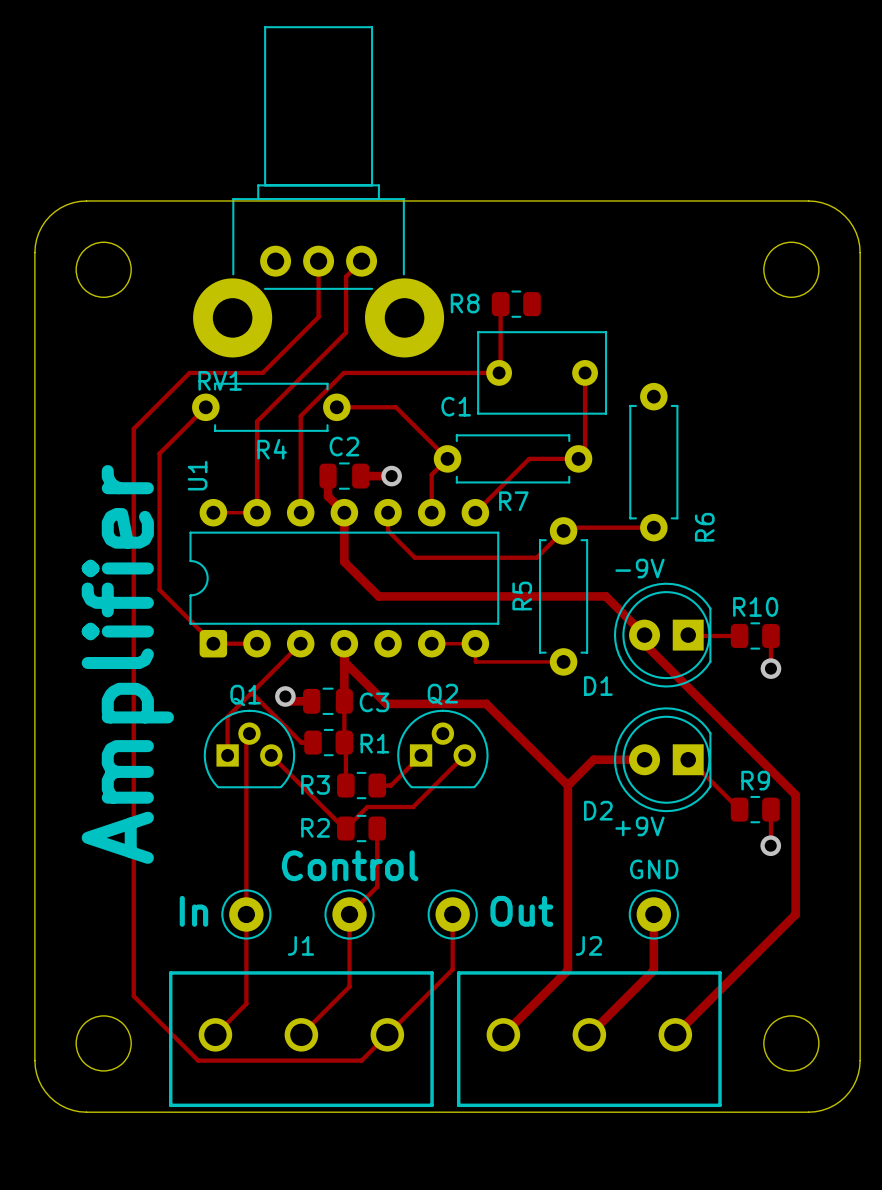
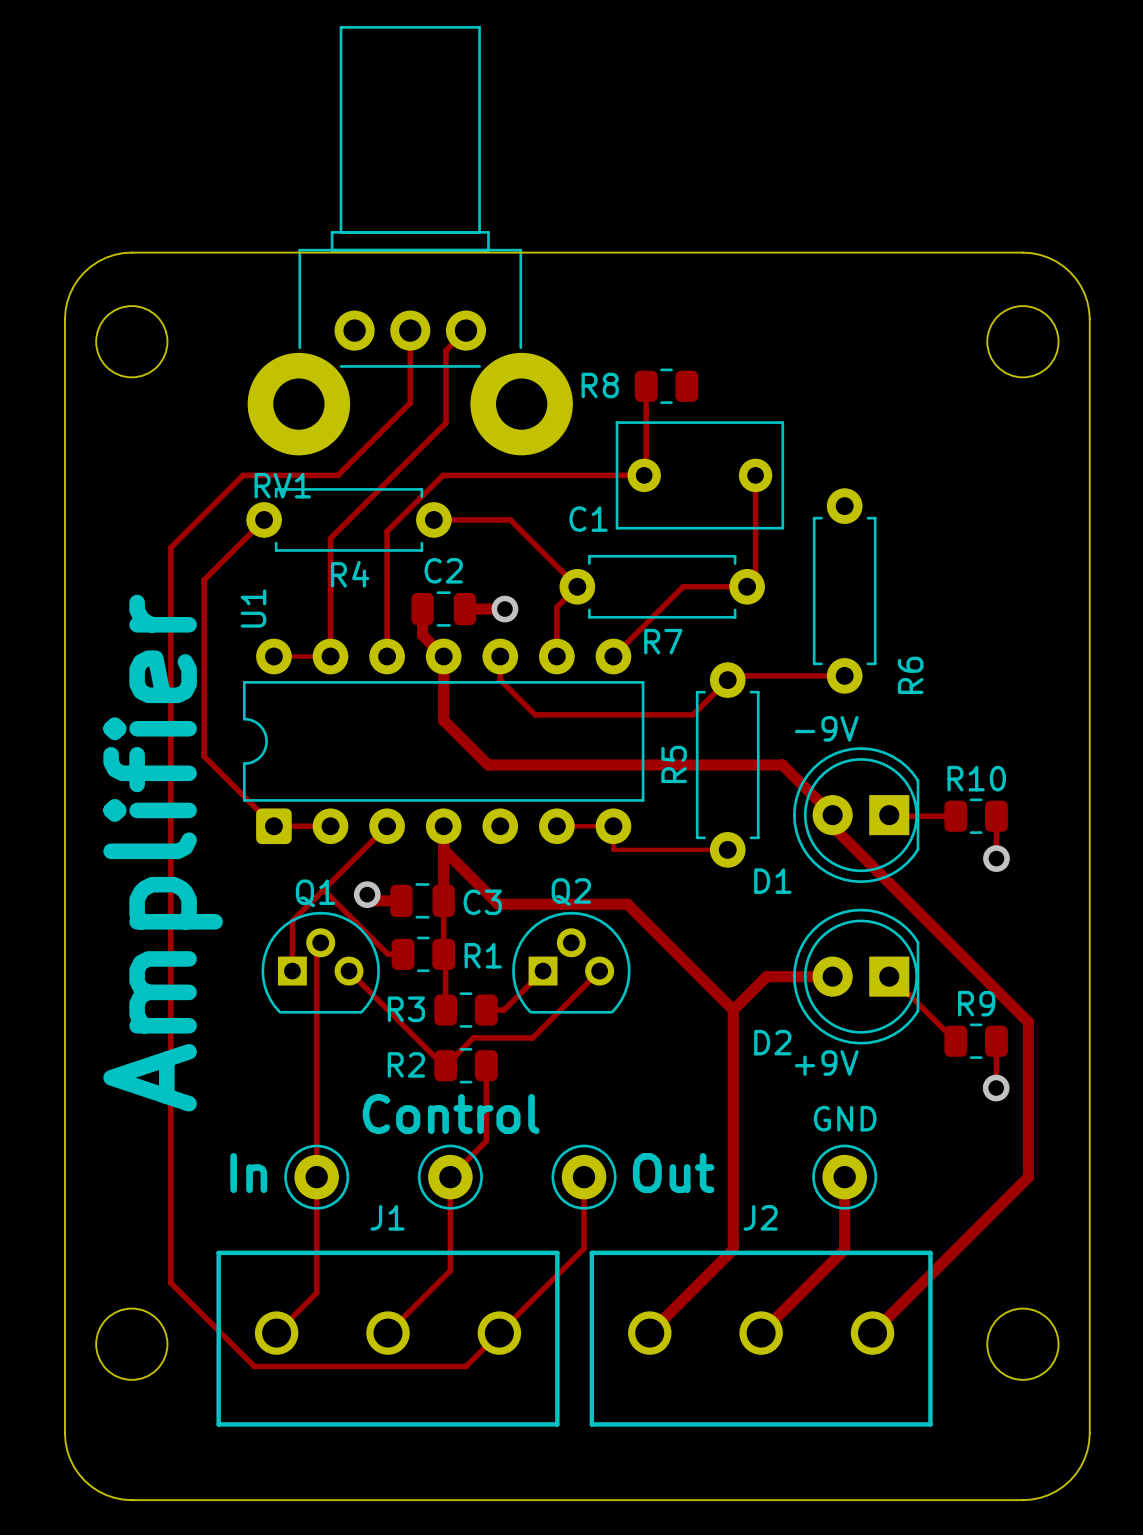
board edge: (103, 201) (73, 202) (55, 211) (45, 221) (38, 232) (34, 252) (34, 1060) (38, 1080) (50, 1097) (66, 1108) (86, 1112) (808, 1112) (821, 1110) (834, 1105) (849, 1092) (858, 1073) (860, 1060) (860, 252) (858, 239) (853, 226) (839, 211) (821, 202) (791, 201) -> (131, 252) (106, 257) (84, 272) (70, 293) (64, 319) (64, 1433) (70, 1458) (84, 1480) (106, 1495) (131, 1500) (1022, 1500) (1048, 1495) (1063, 1486) (1075, 1474) (1084, 1458) (1089, 1433) (1089, 319) (1084, 293) (1070, 272) (1048, 257) (1022, 252)

